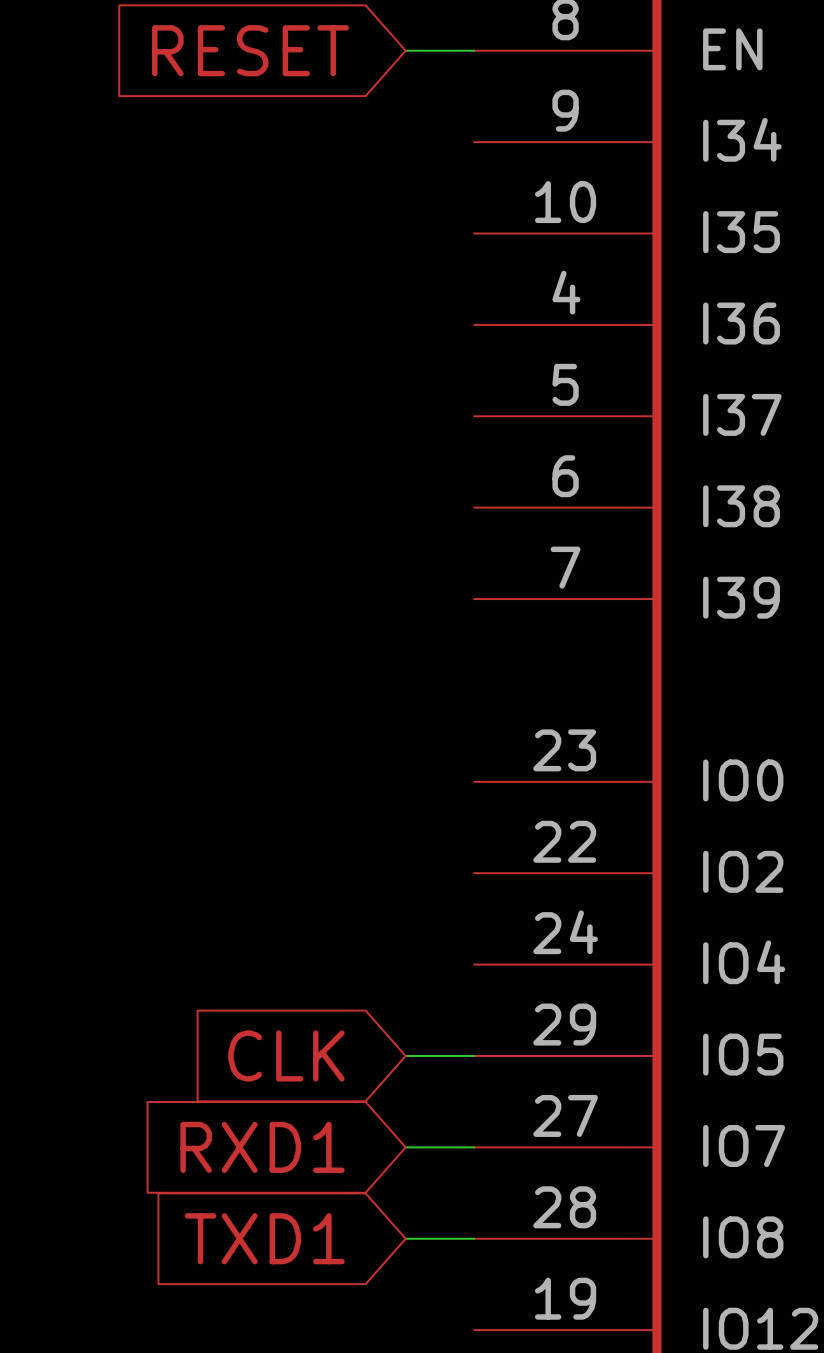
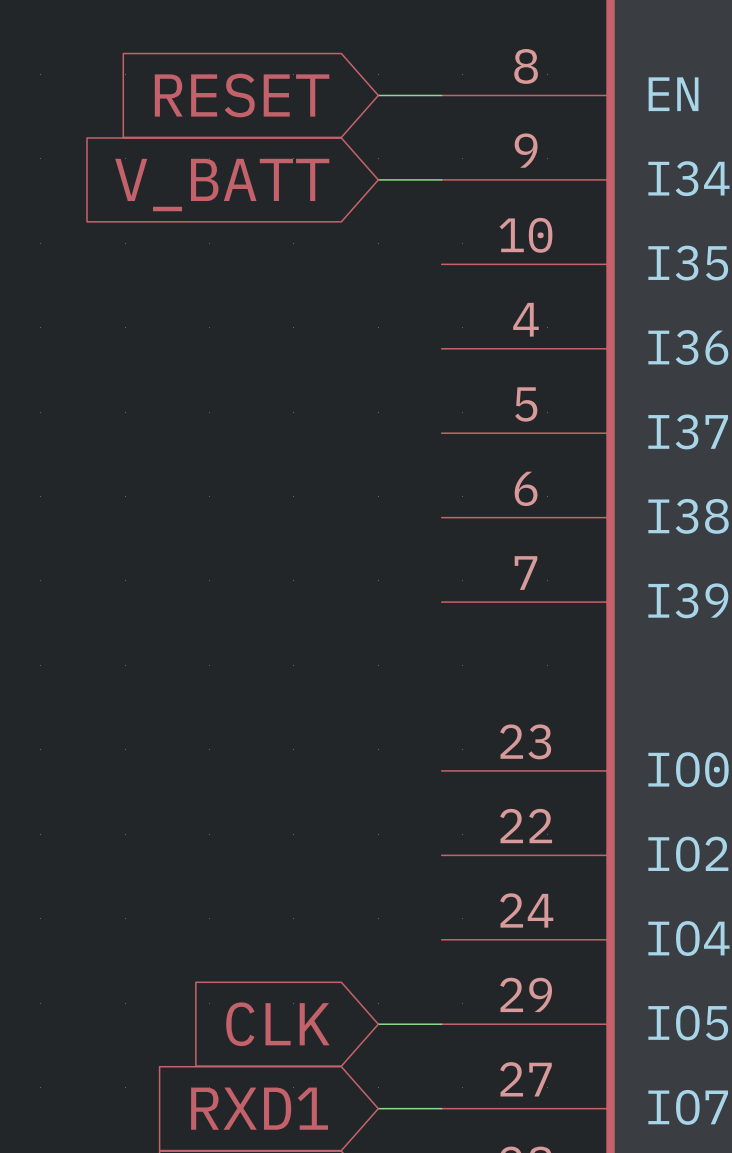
wire: none -> (378, 179) (441, 179)
global label: none -> V_BATT (222, 185)

